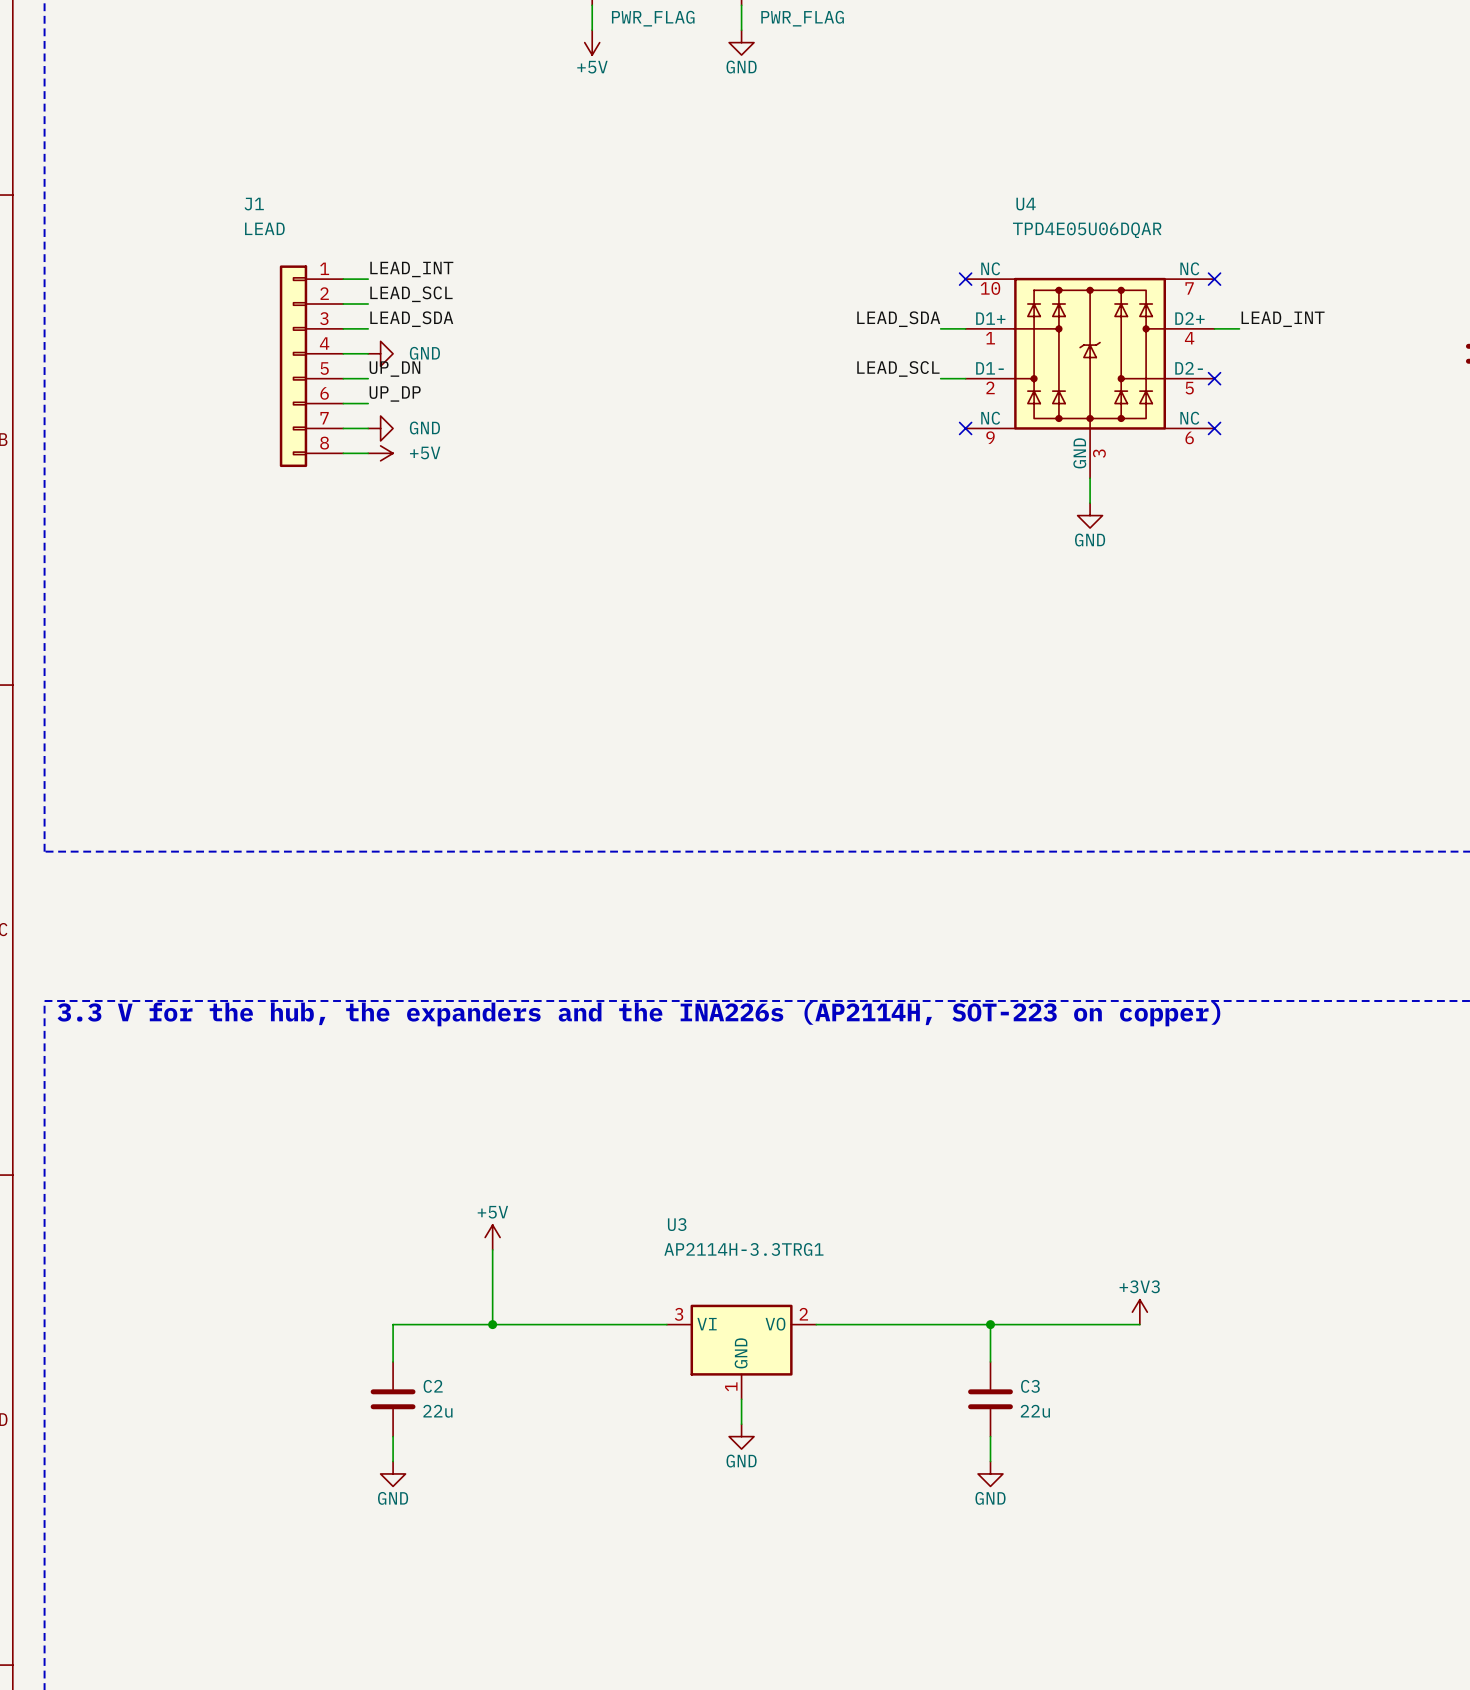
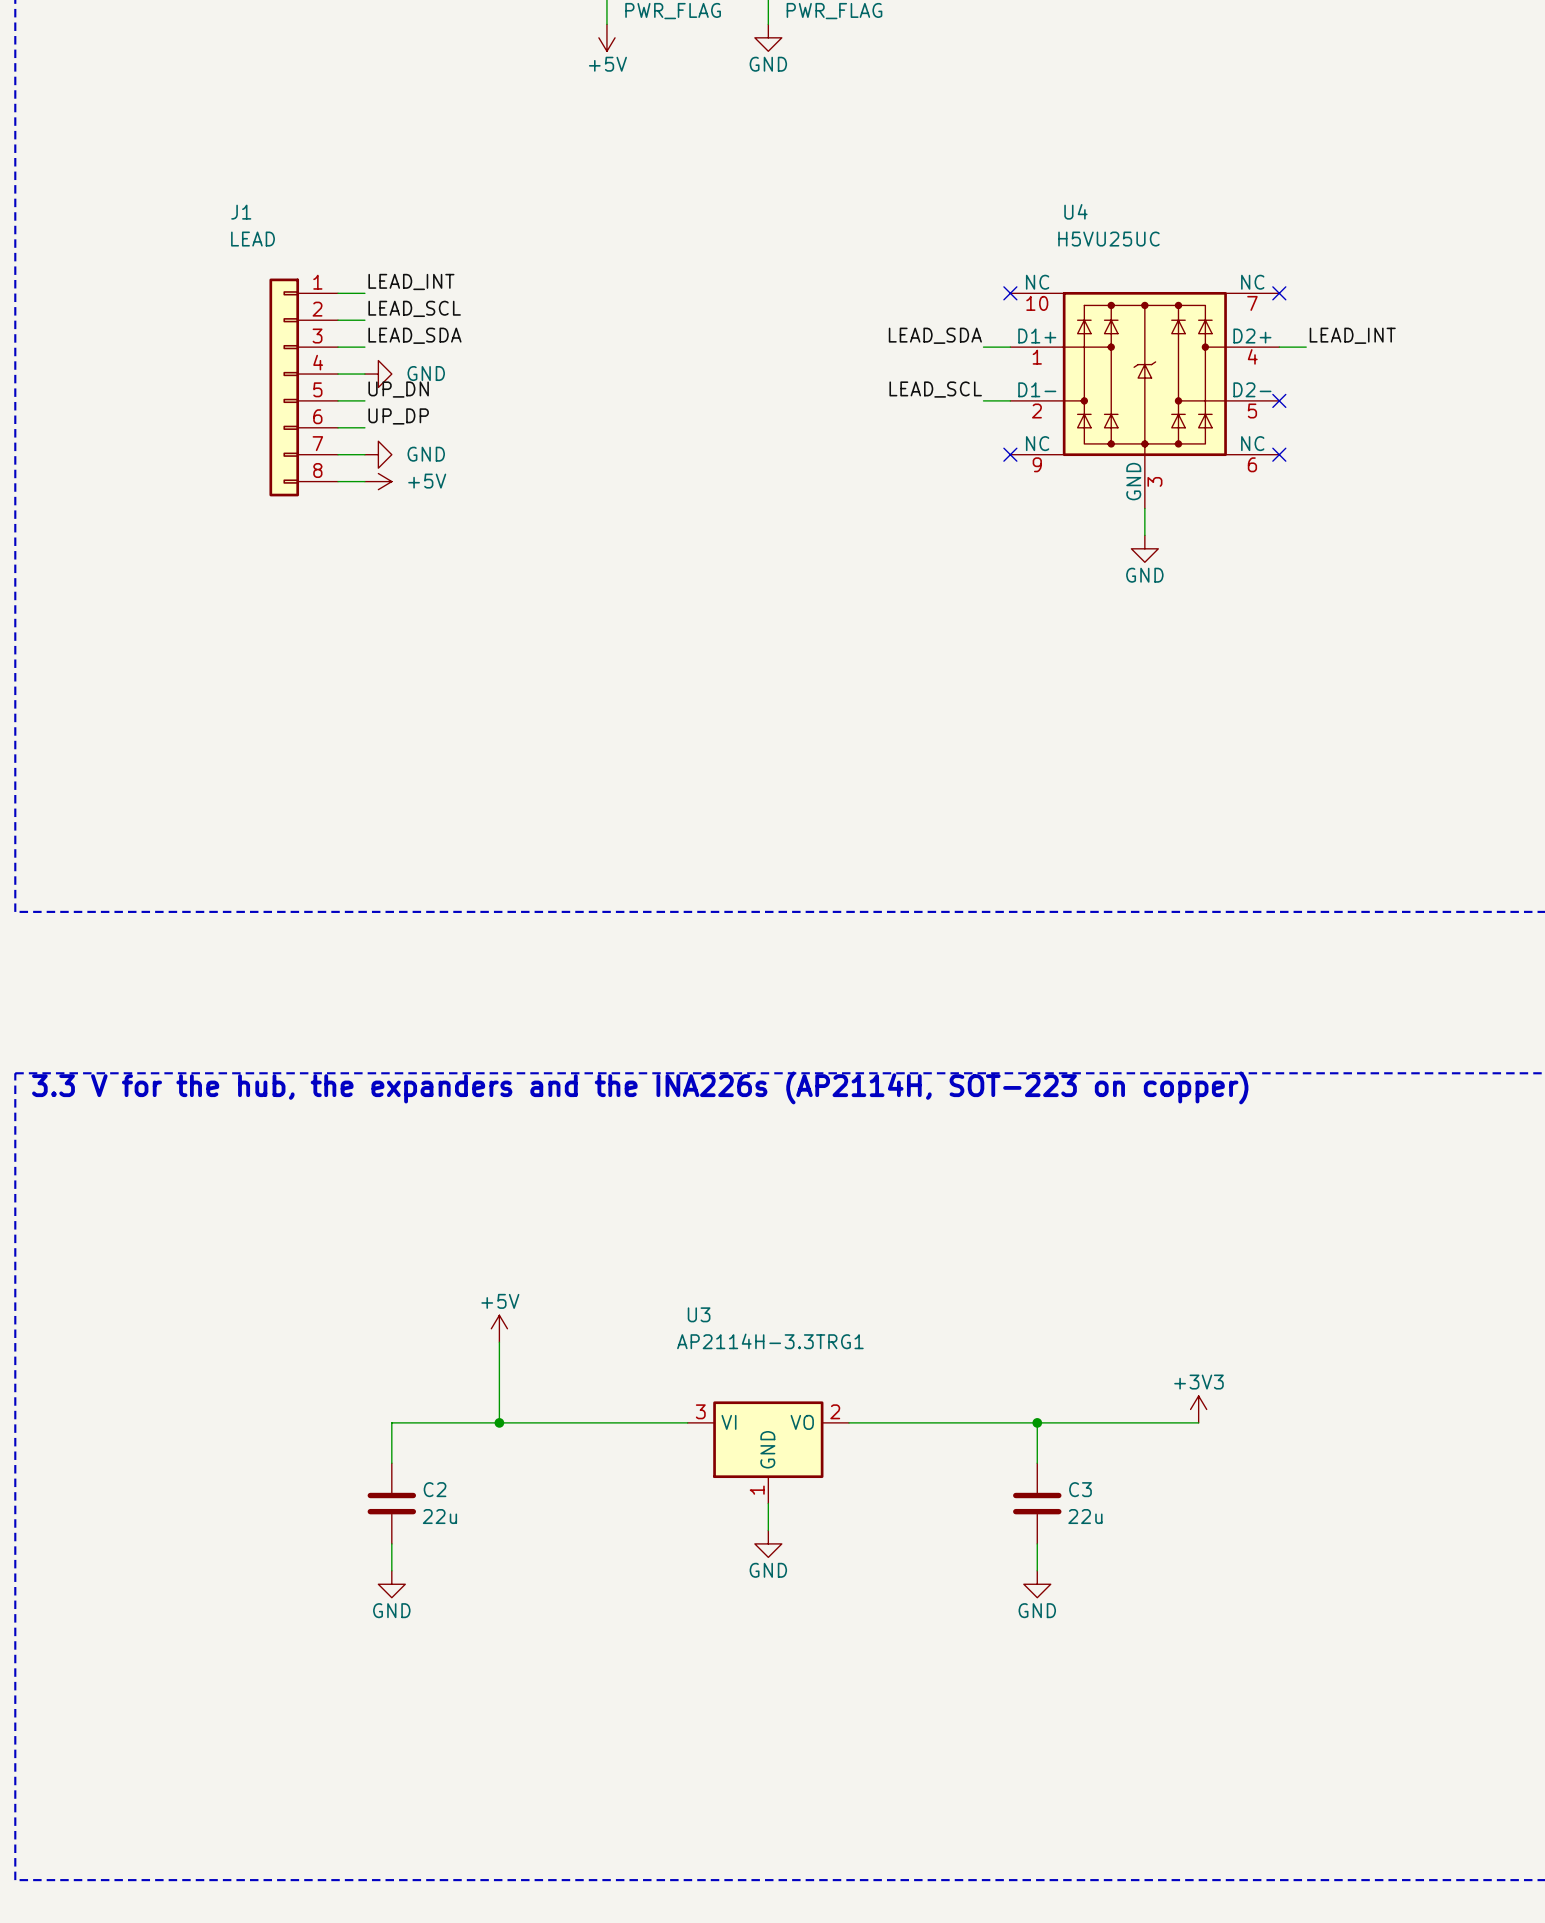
U4 value: TPD4E05U06DQAR (1087, 230) -> H5VU25UC (1108, 239)

